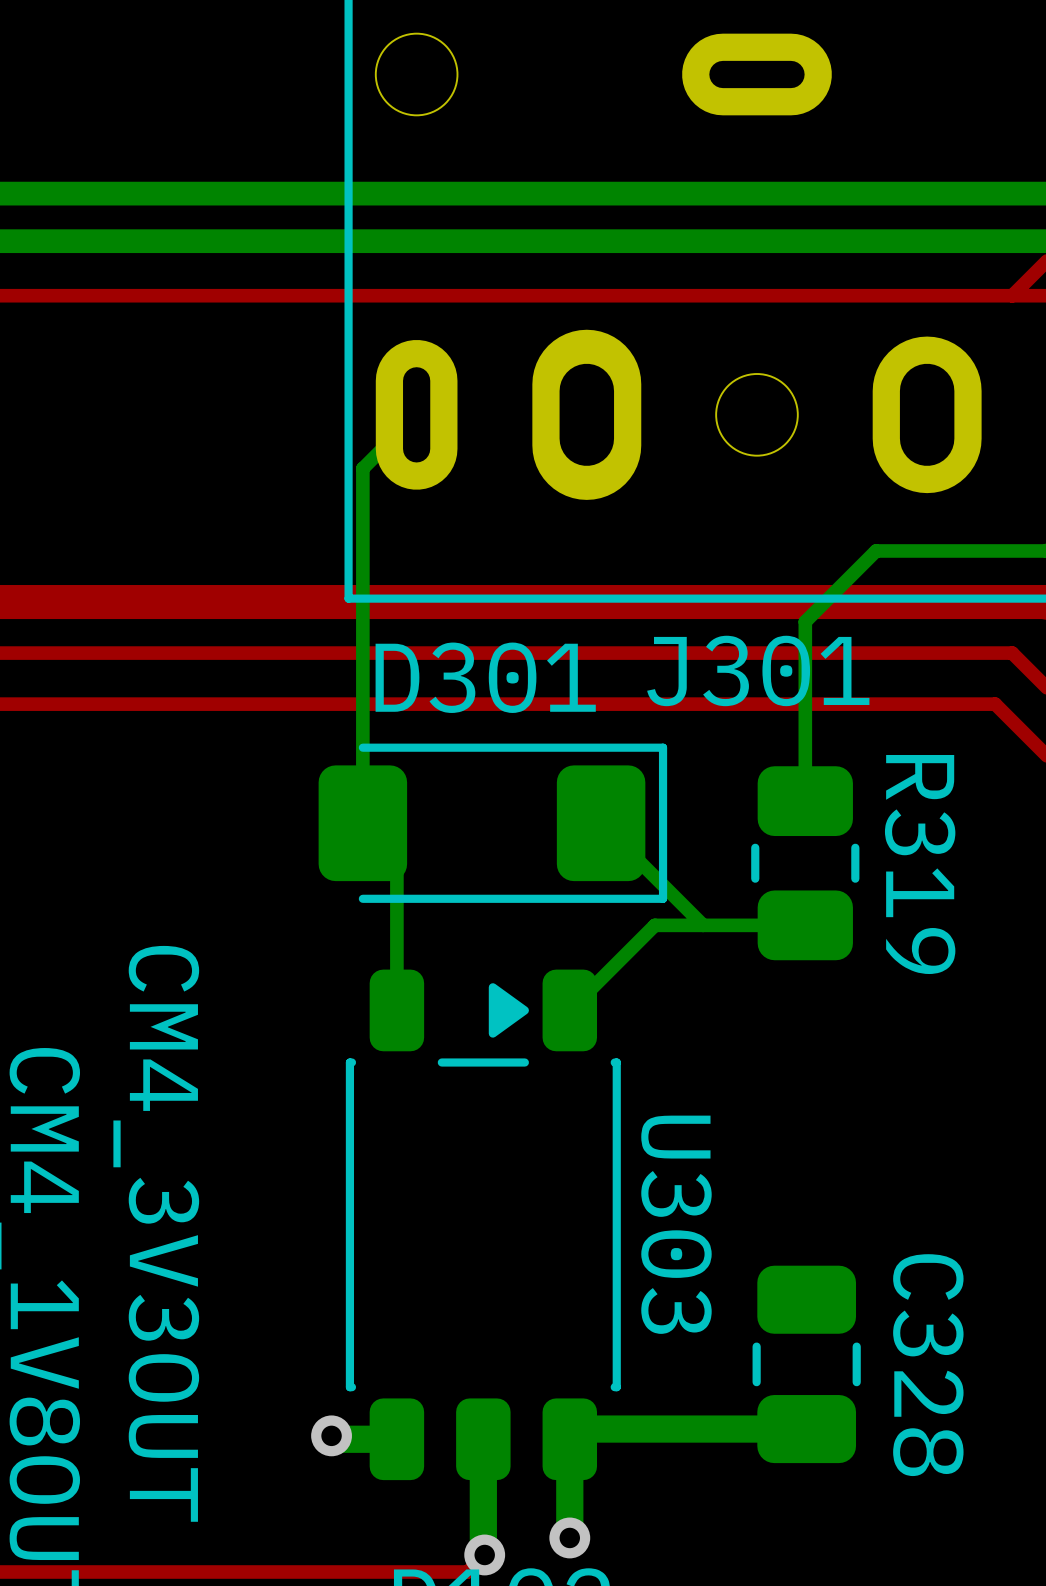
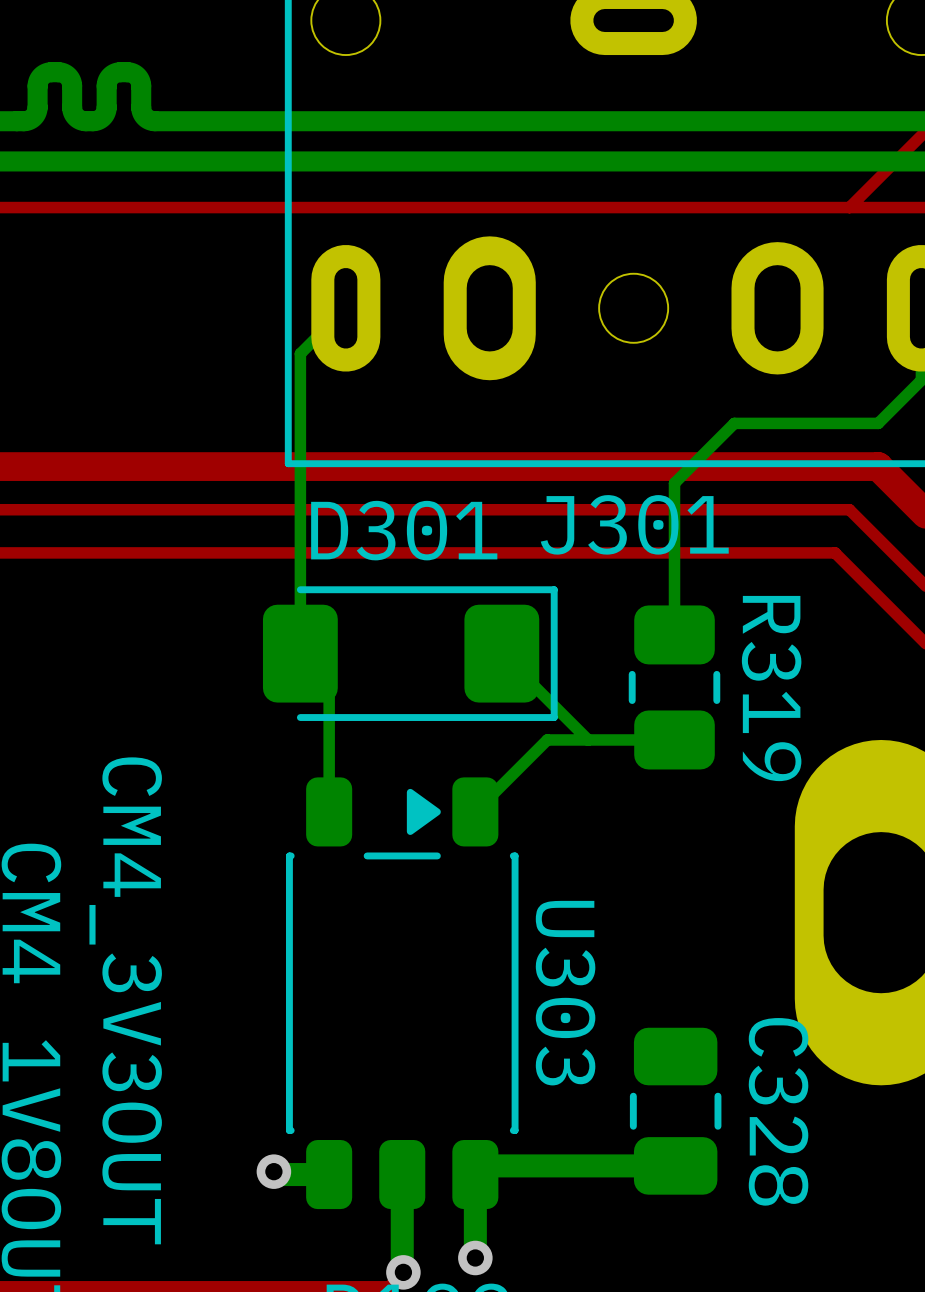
bottom track: (109, 193) (35, 193) -> (85, 121) (78, 119) (72, 111) (72, 84) (70, 78) (64, 73) (58, 72) (46, 72) (39, 78) (37, 84) (36, 111) (31, 119) (23, 121)
bottom track: (190, 193) (117, 193) -> (155, 121) (146, 118) (141, 111) (141, 84) (139, 78) (134, 74) (127, 72) (115, 72) (108, 78) (106, 84) (105, 111) (100, 119) (92, 121)

